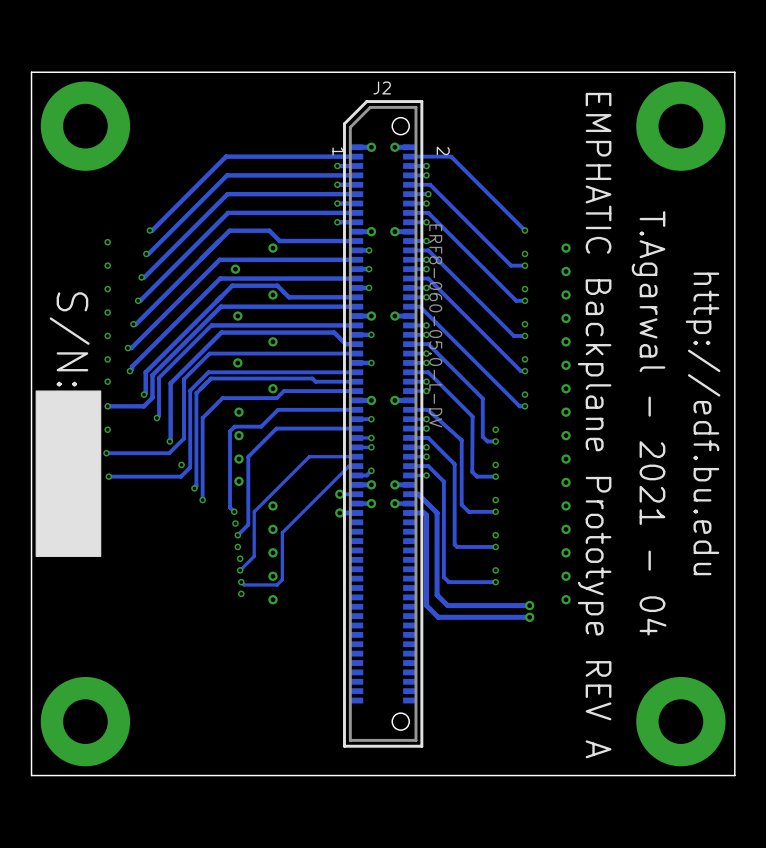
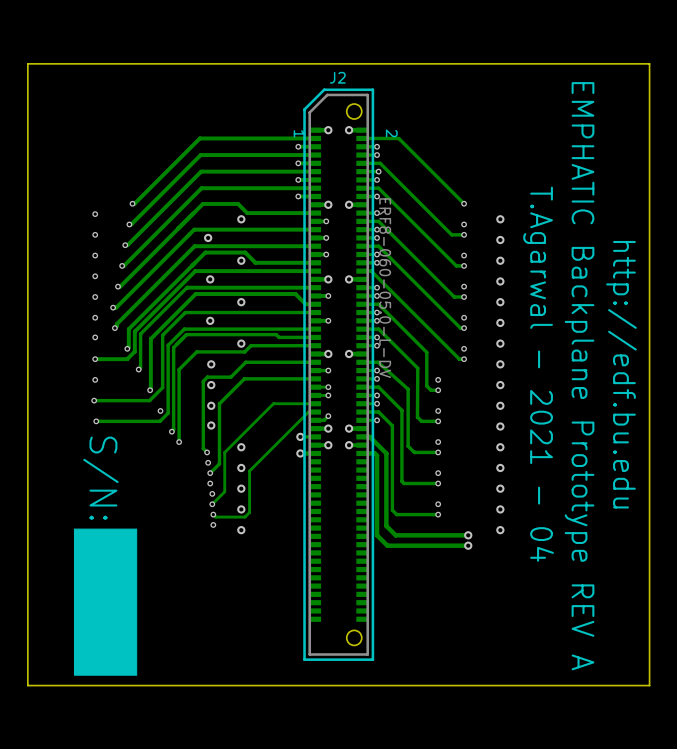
part: (85, 126) -> none
part: (680, 126) -> none
text position: S/N: (69, 339) -> S/N: (100, 478)
drawing: [35, 390, 102, 557] -> none
text position: T.Agarwal - 2021 - 04 (649, 423) -> T.Agarwal - 2021 - 04 (538, 374)
text position: EMPHATIC Backplane Prototype REV A (594, 425) -> EMPHATIC Backplane Prototype REV A (579, 376)
drawing: none -> [73, 528, 138, 676]
part: (85, 721) -> none
part: (680, 721) -> none

